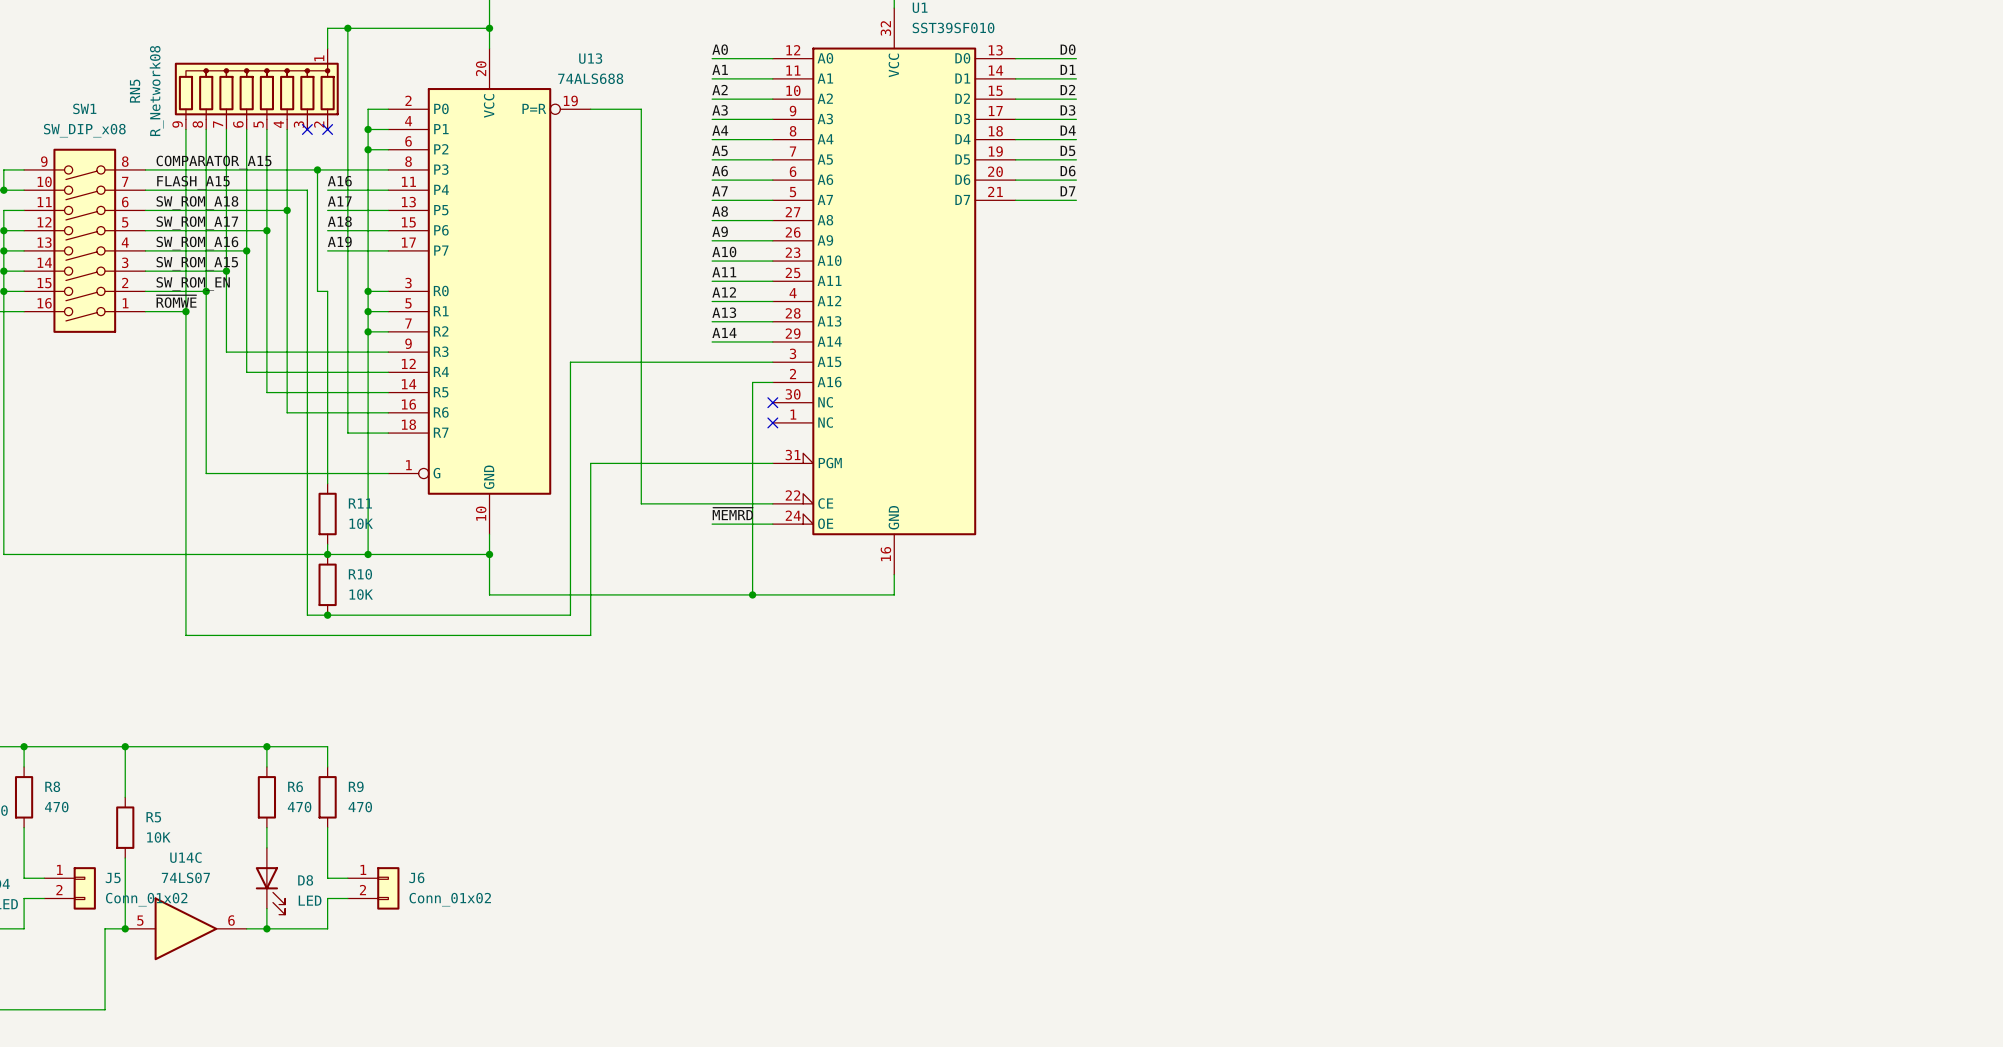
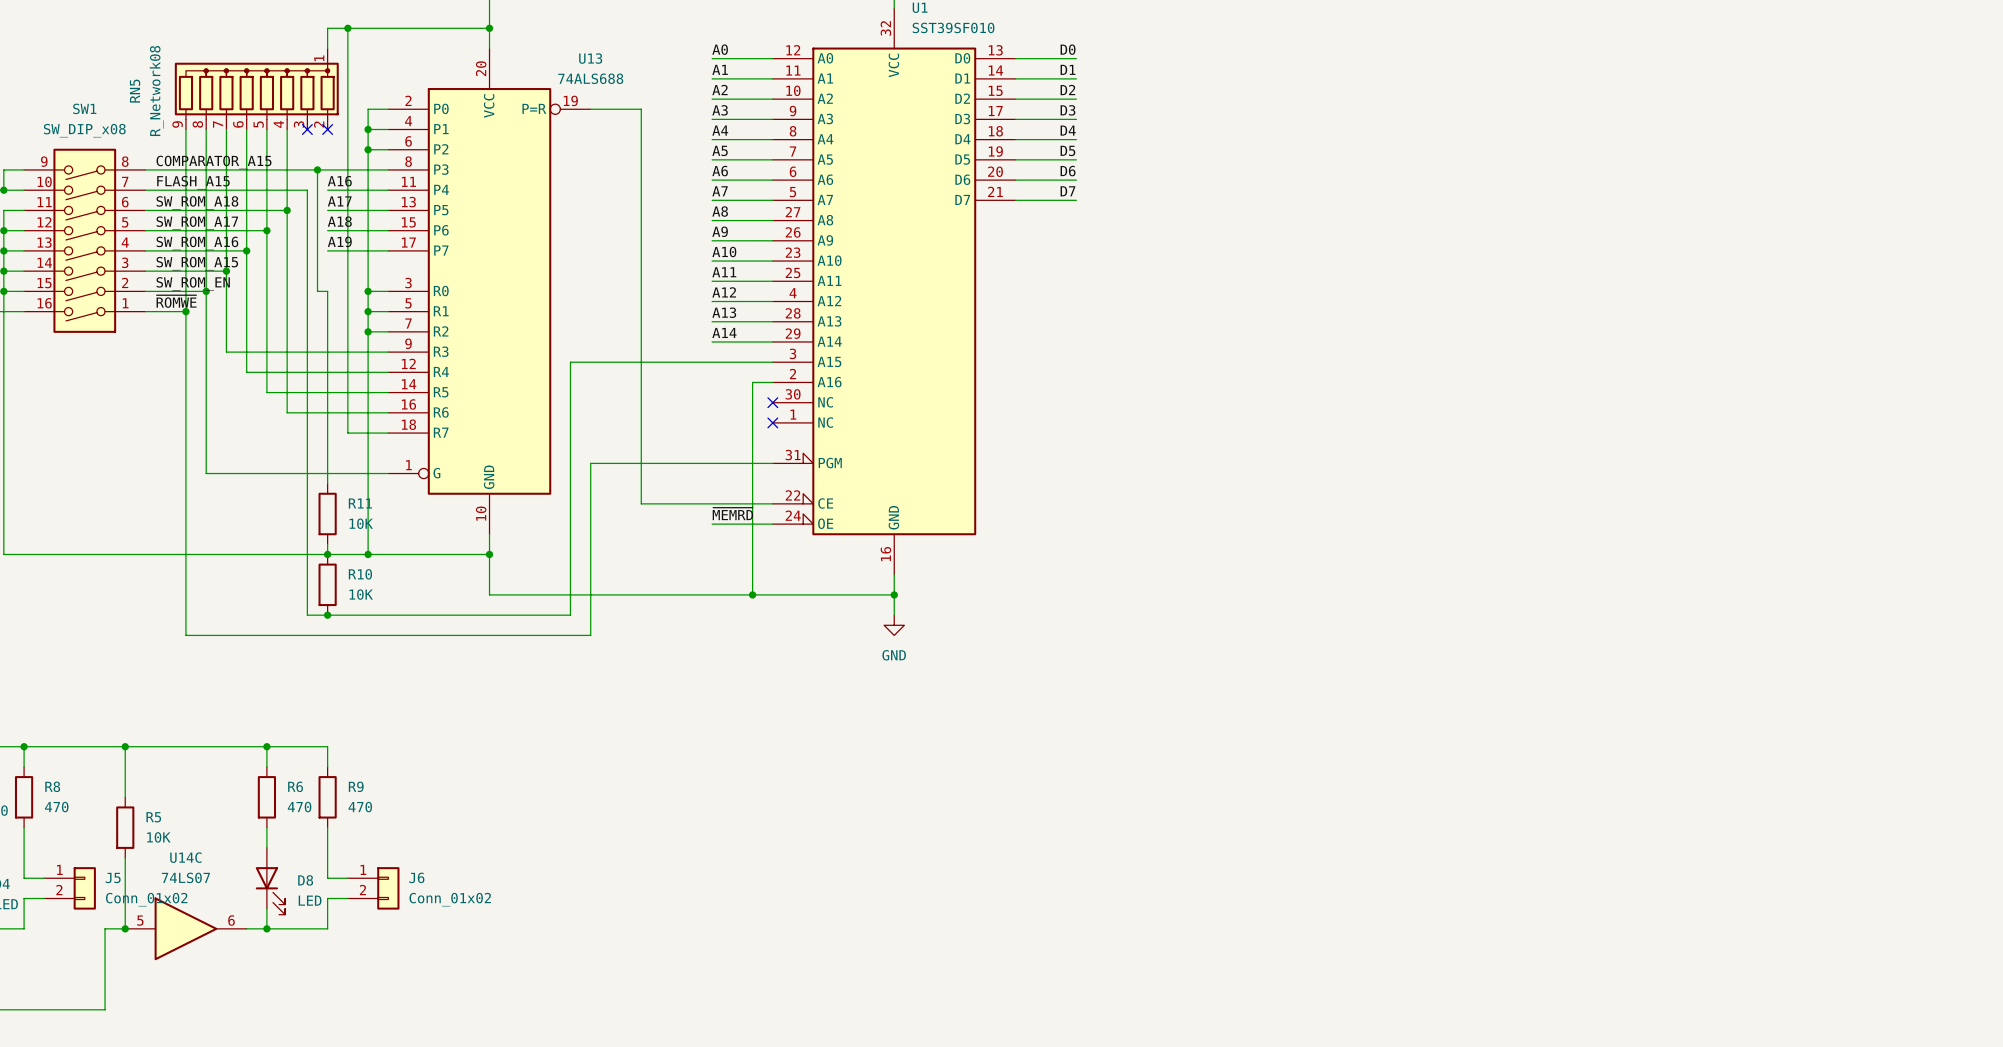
wire: none -> (894, 594) (894, 615)
junction: none -> (894, 594)
power symbol: none -> GND (894, 625)

